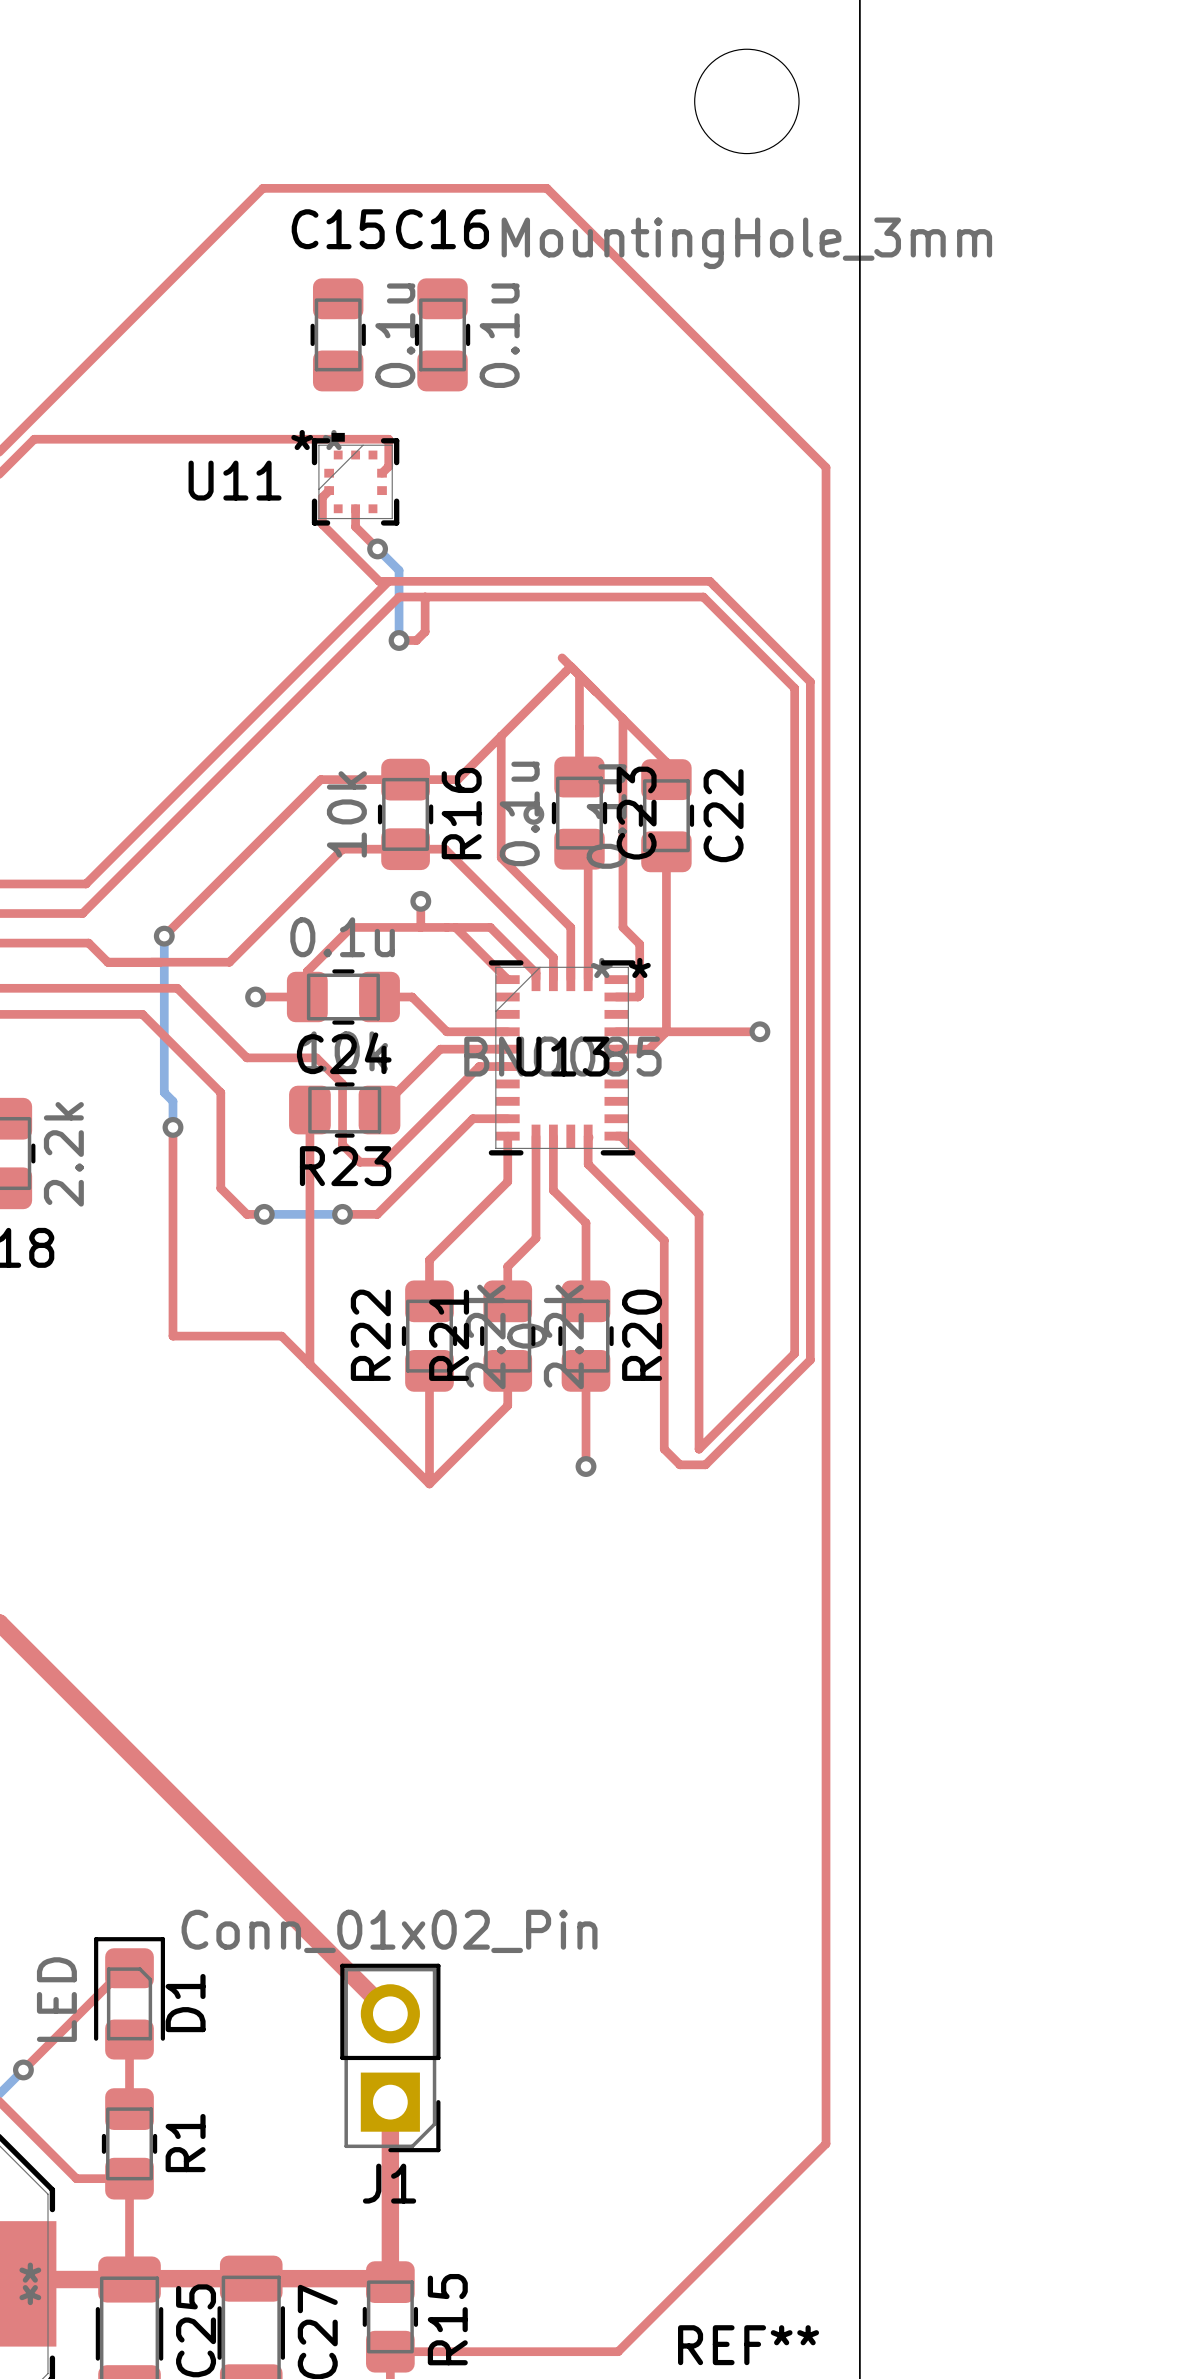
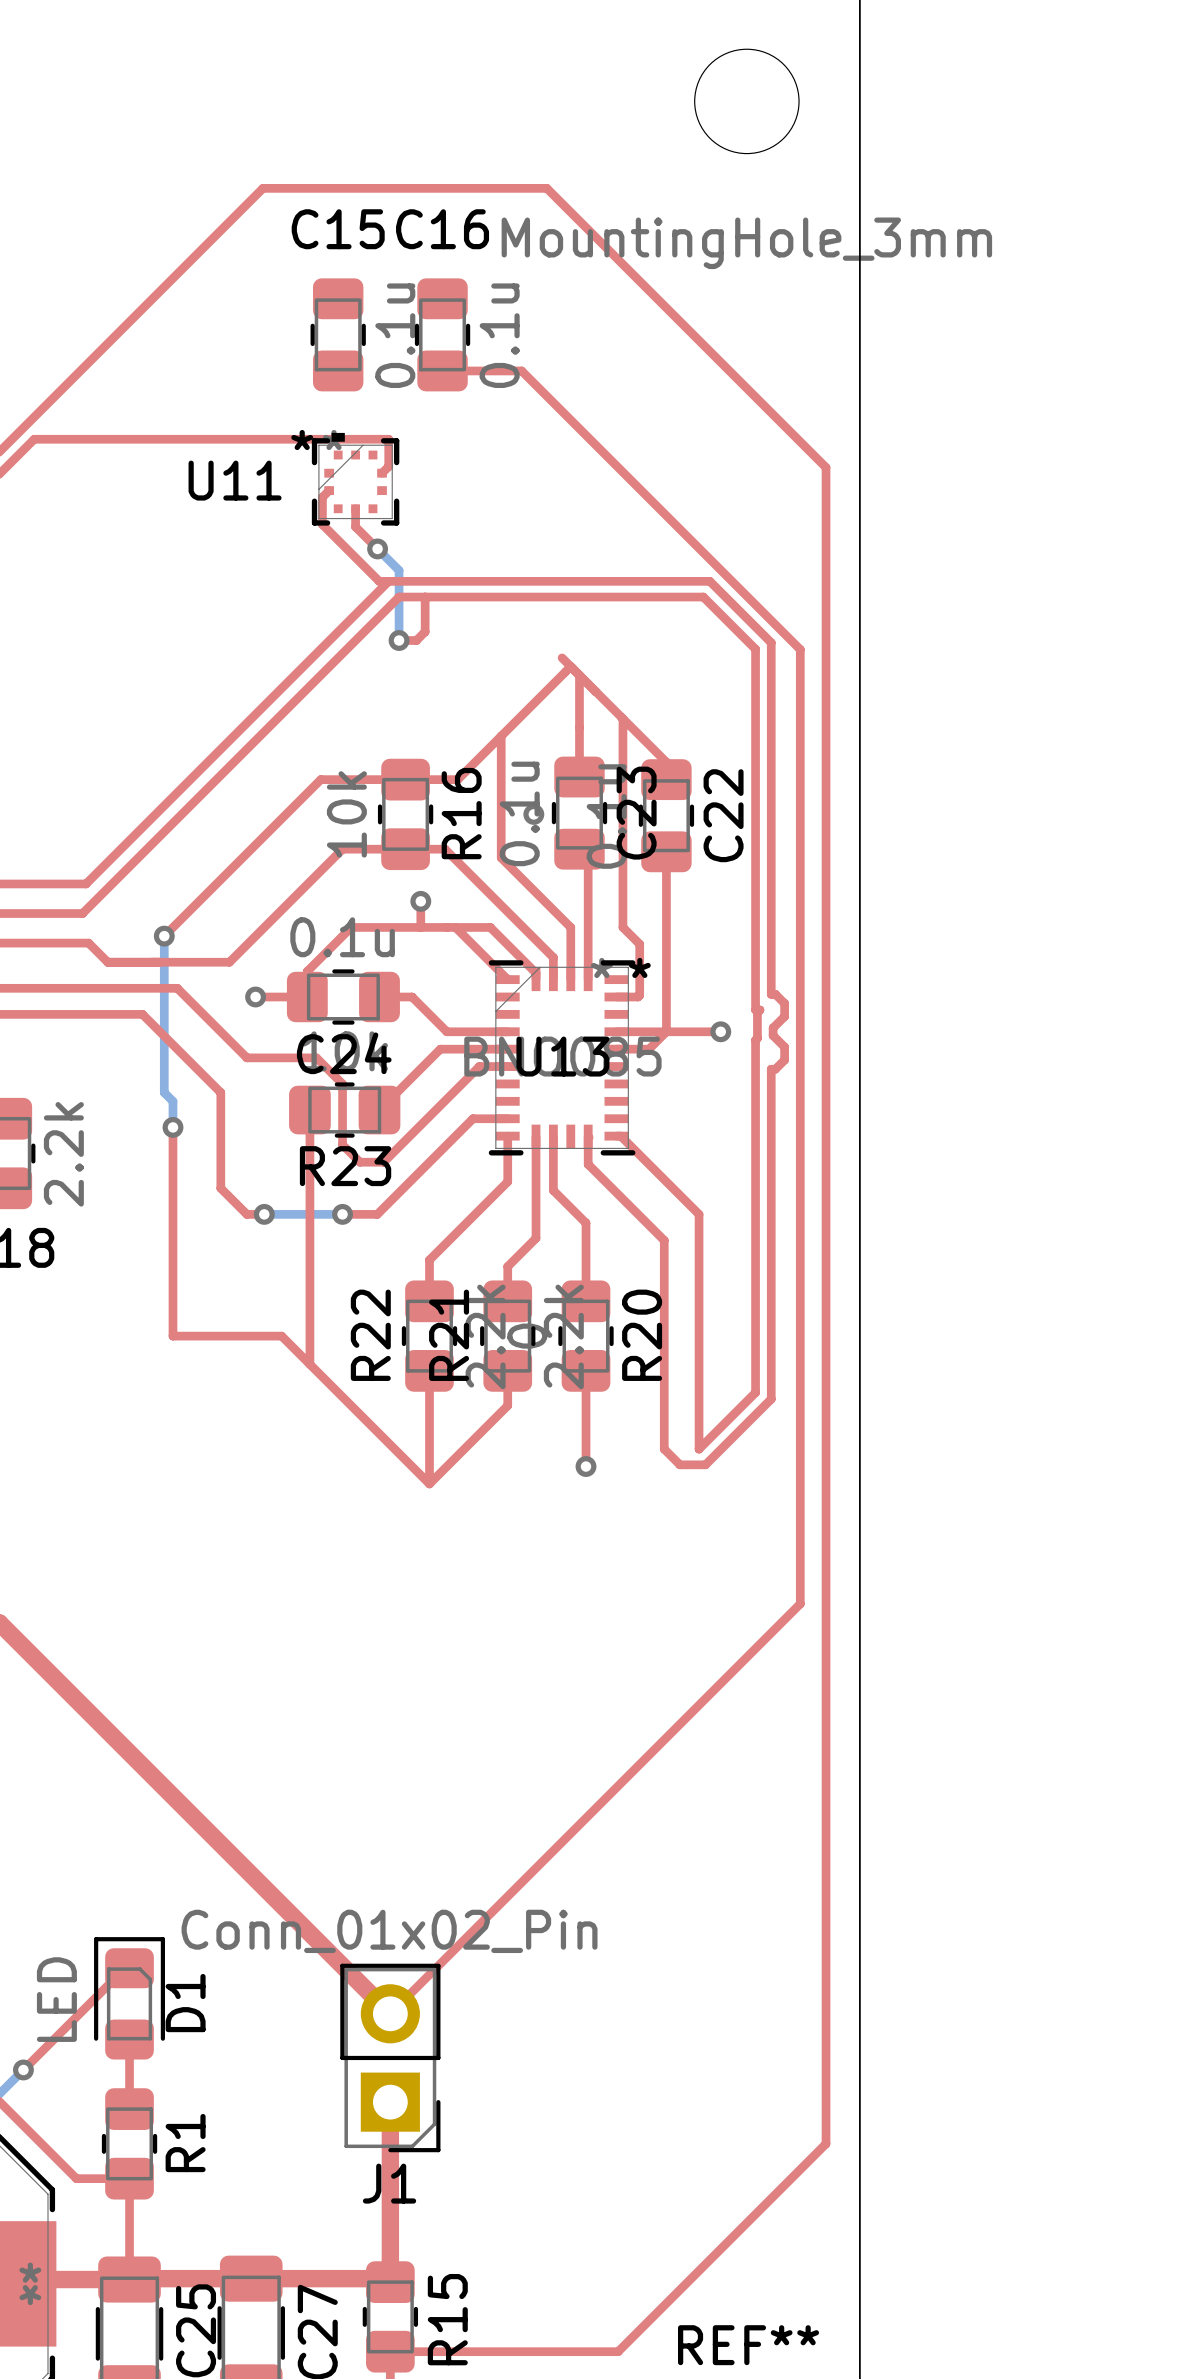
top track: none -> (442, 370) (521, 370) (800, 649) (800, 1603) (390, 2013)
top track: (771, 642) (810, 681) (810, 1360) (771, 1399) -> (771, 642) (771, 994) (775, 994) (784, 1003) (784, 1016) (773, 1027) (773, 1035) (784, 1047) (784, 1060) (775, 1069) (771, 1069) (771, 1399)
top track: (755, 649) (794, 688) (794, 1353) (755, 1392) -> (755, 649) (755, 1010) (759, 1010) (757, 1012) (757, 1038) (755, 1040) (755, 1392)
top track: (720, 1031) (759, 1031) -> none
via position: (759, 1031) -> (720, 1031)

